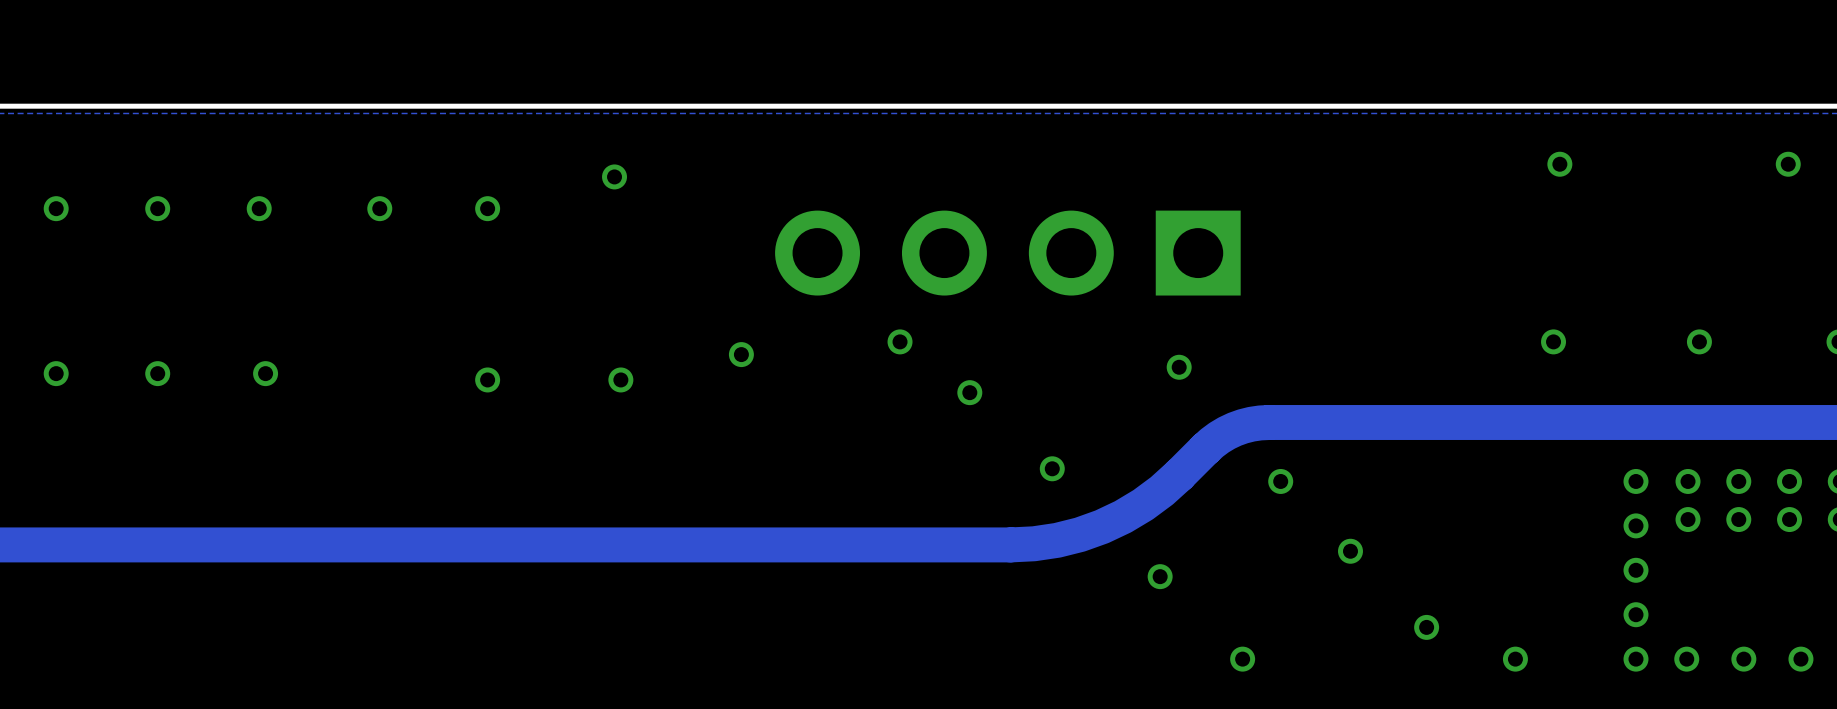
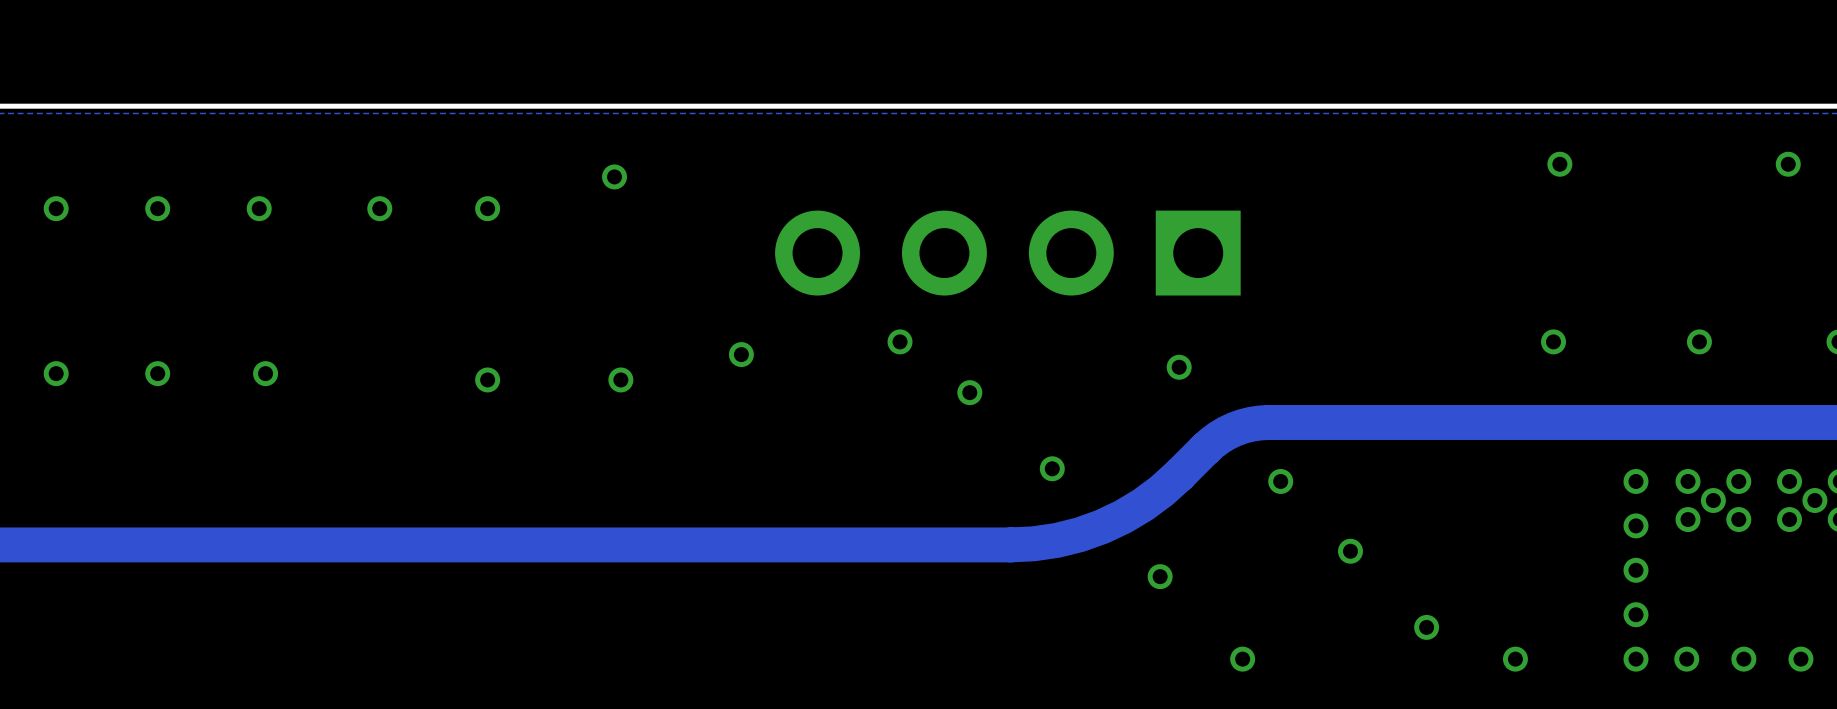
via: none -> (1713, 500)
via: none -> (1814, 500)

